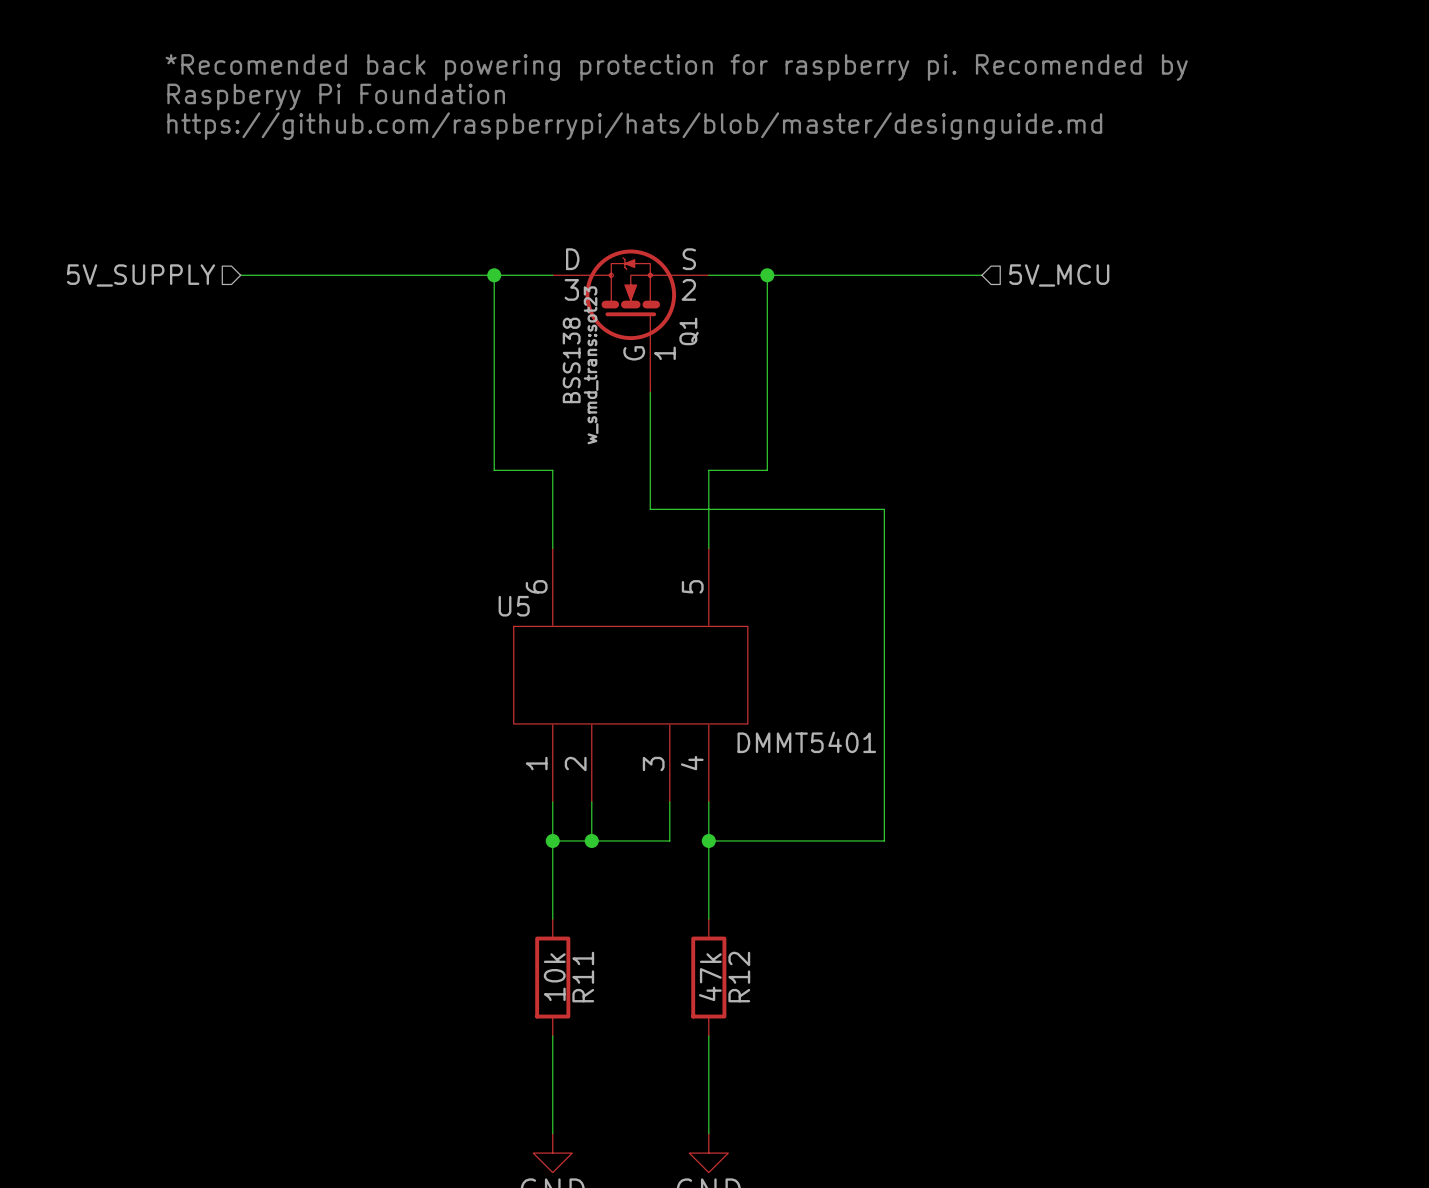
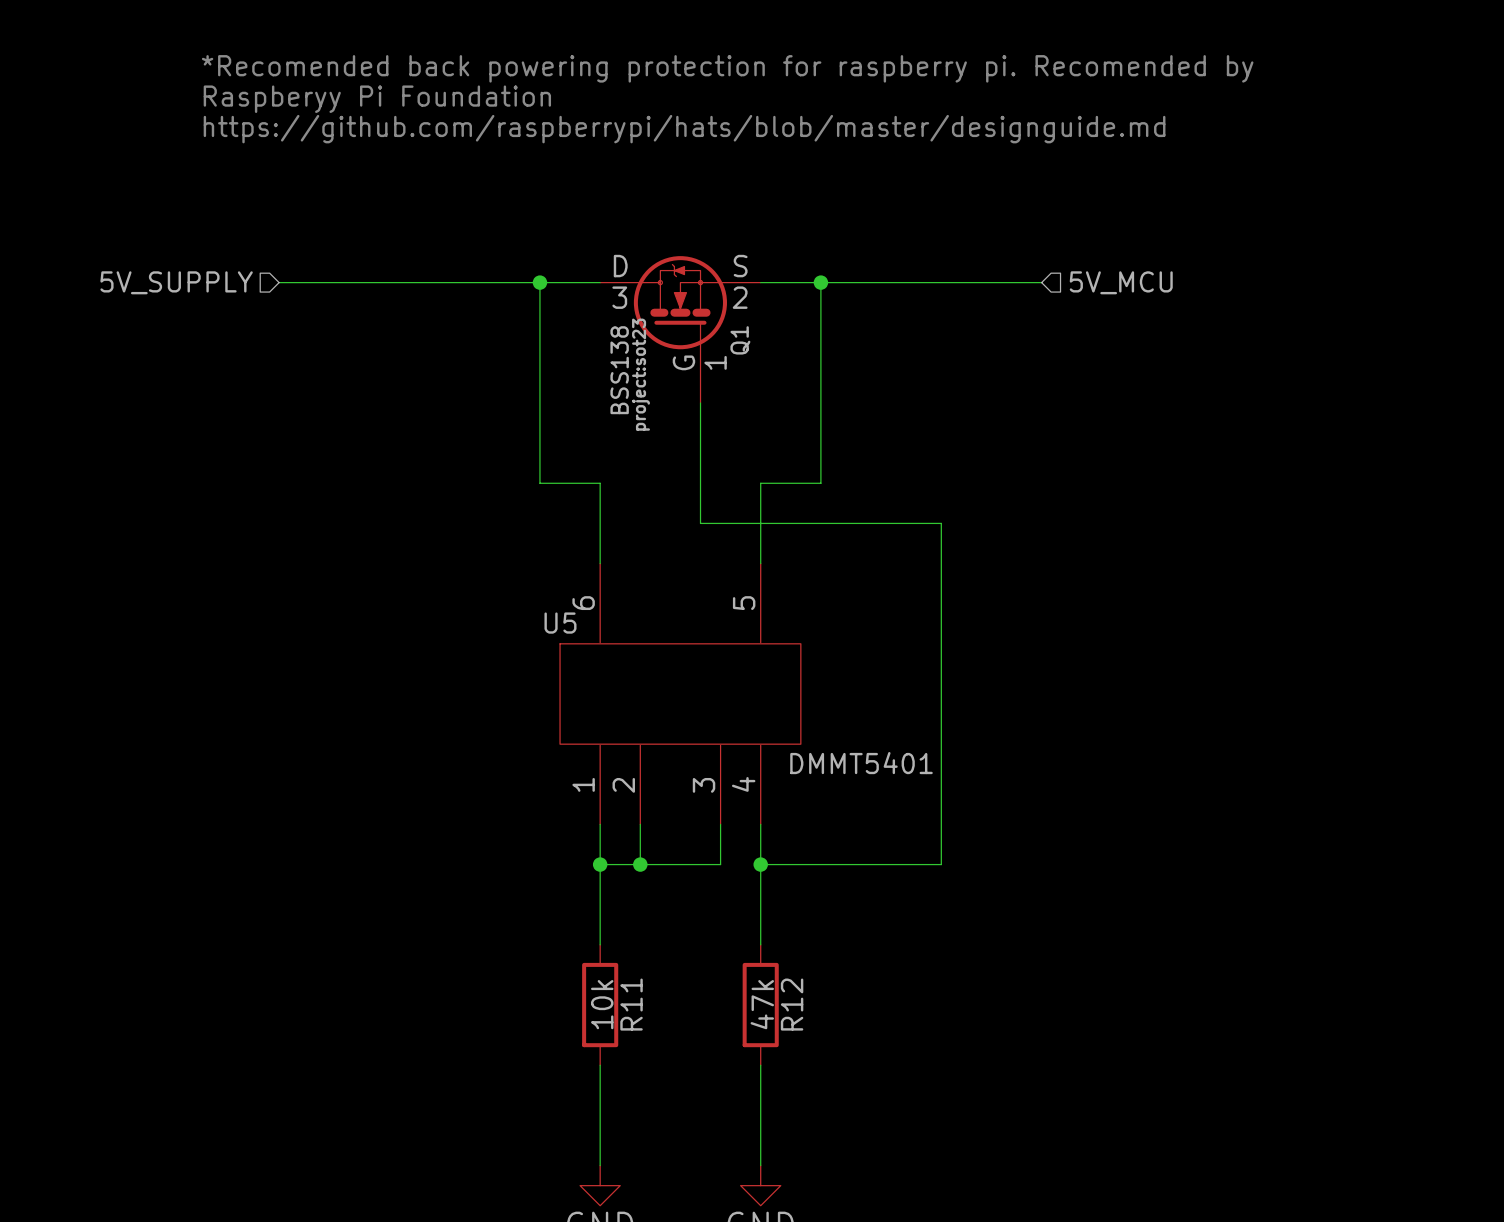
Q1 text: w_smd_trans:sot23 (591, 365) -> project:sot23 (641, 374)

